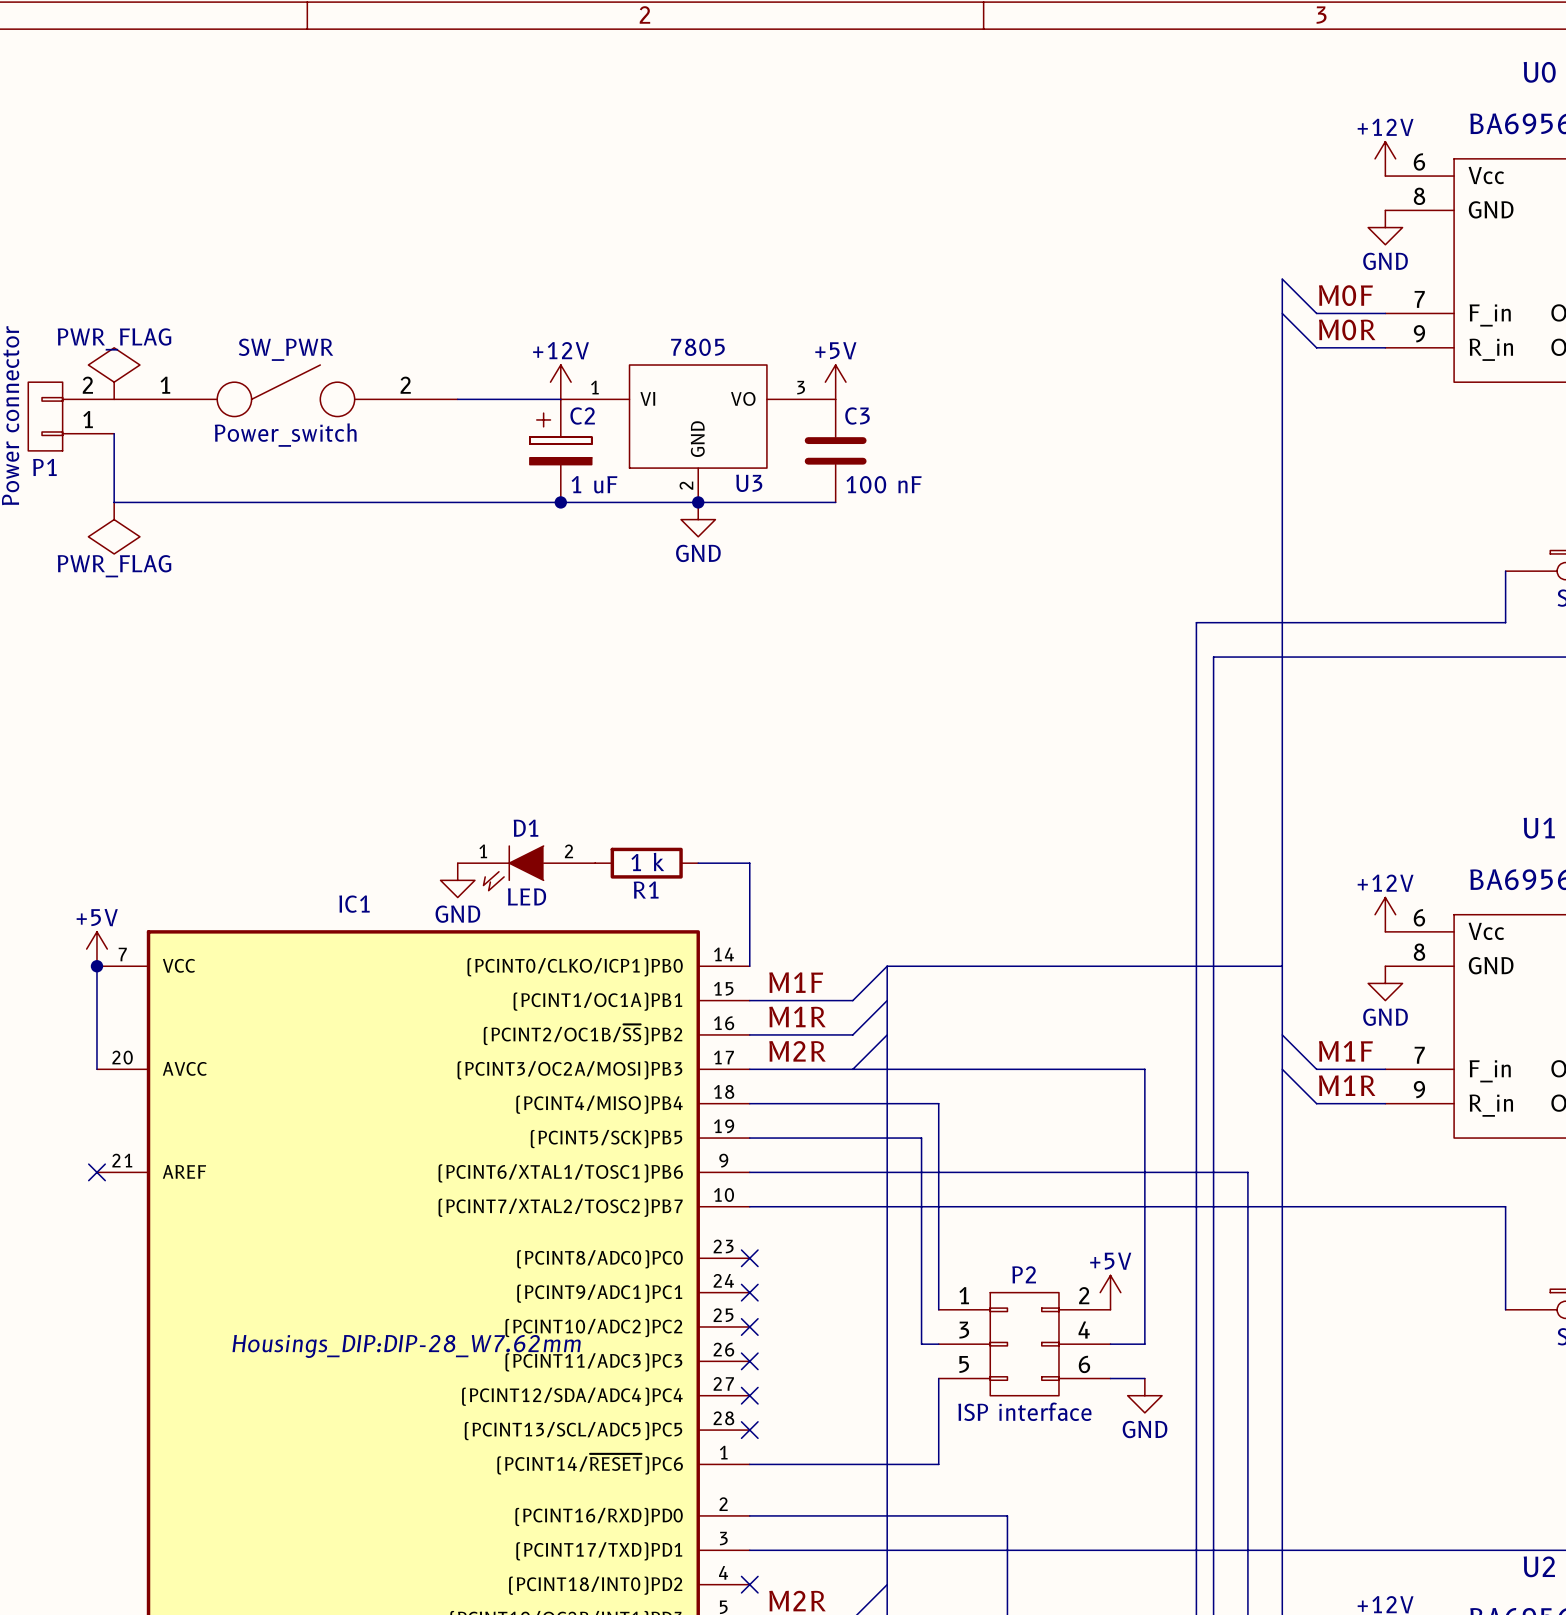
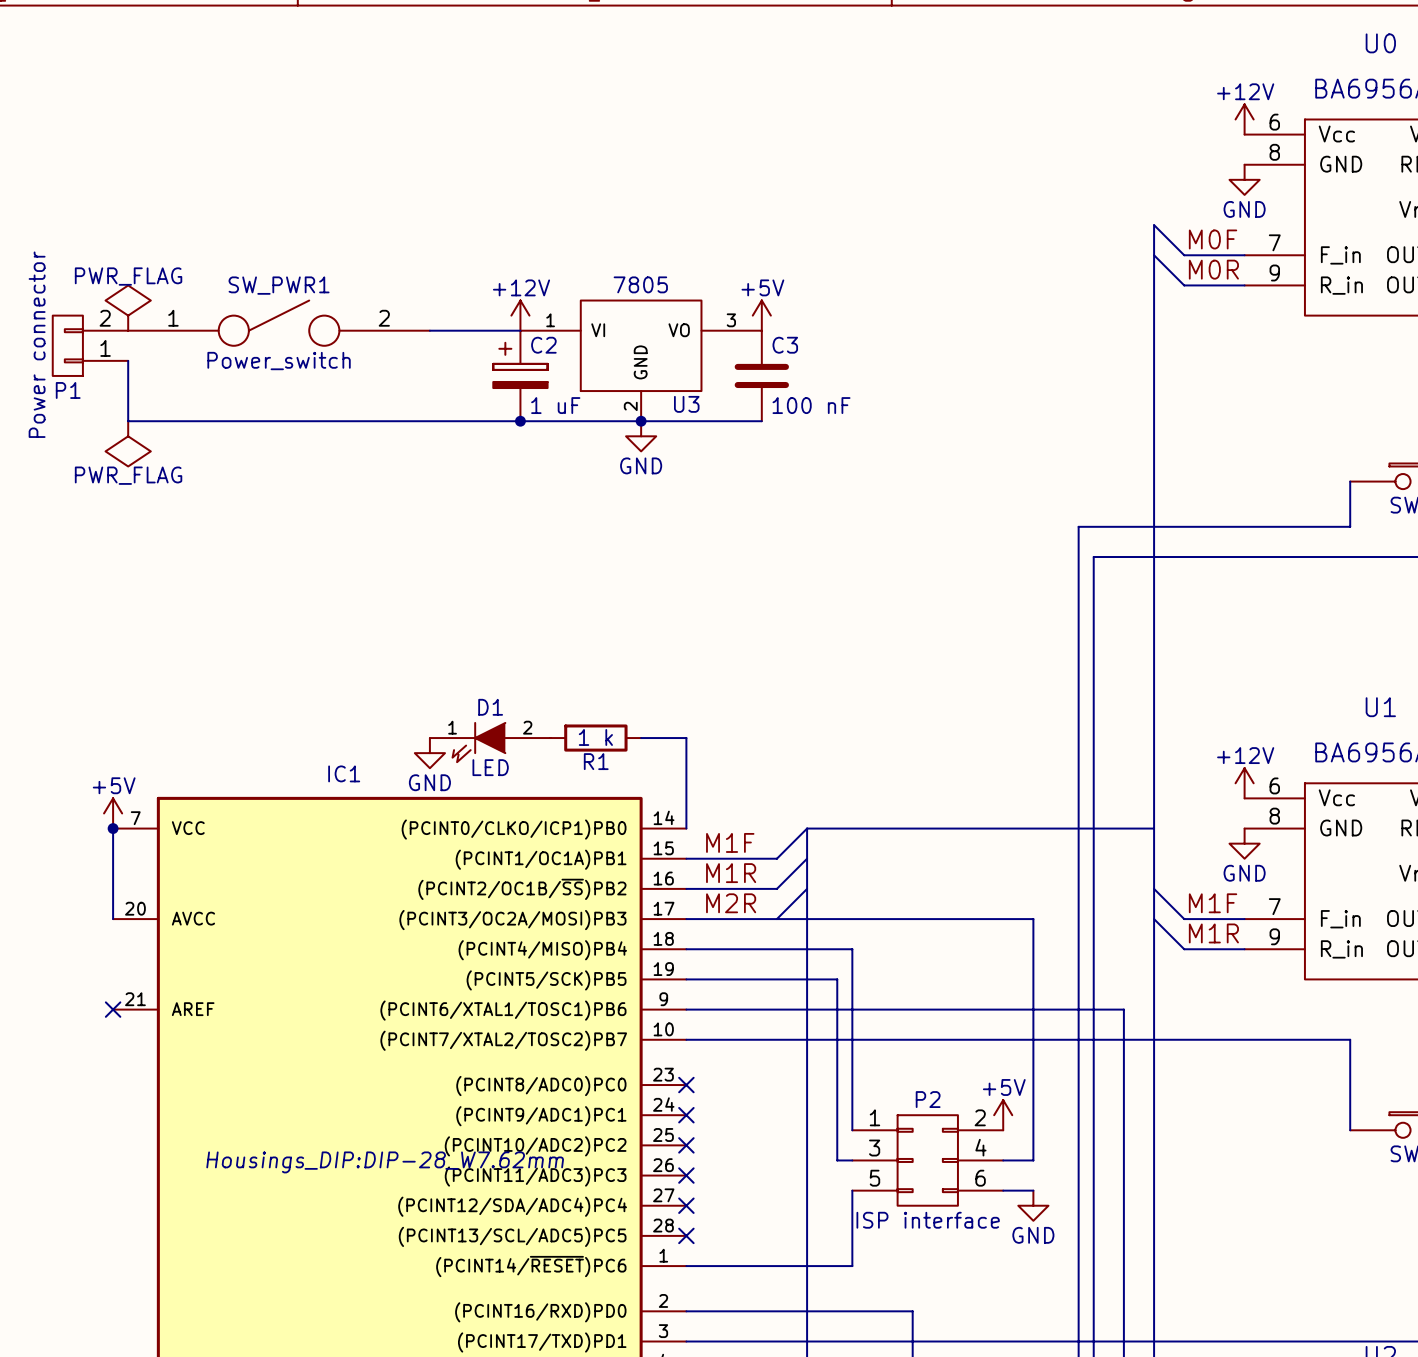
SW_PWR name: SW_PWR (286, 349) -> SW_PWR1 (279, 285)

